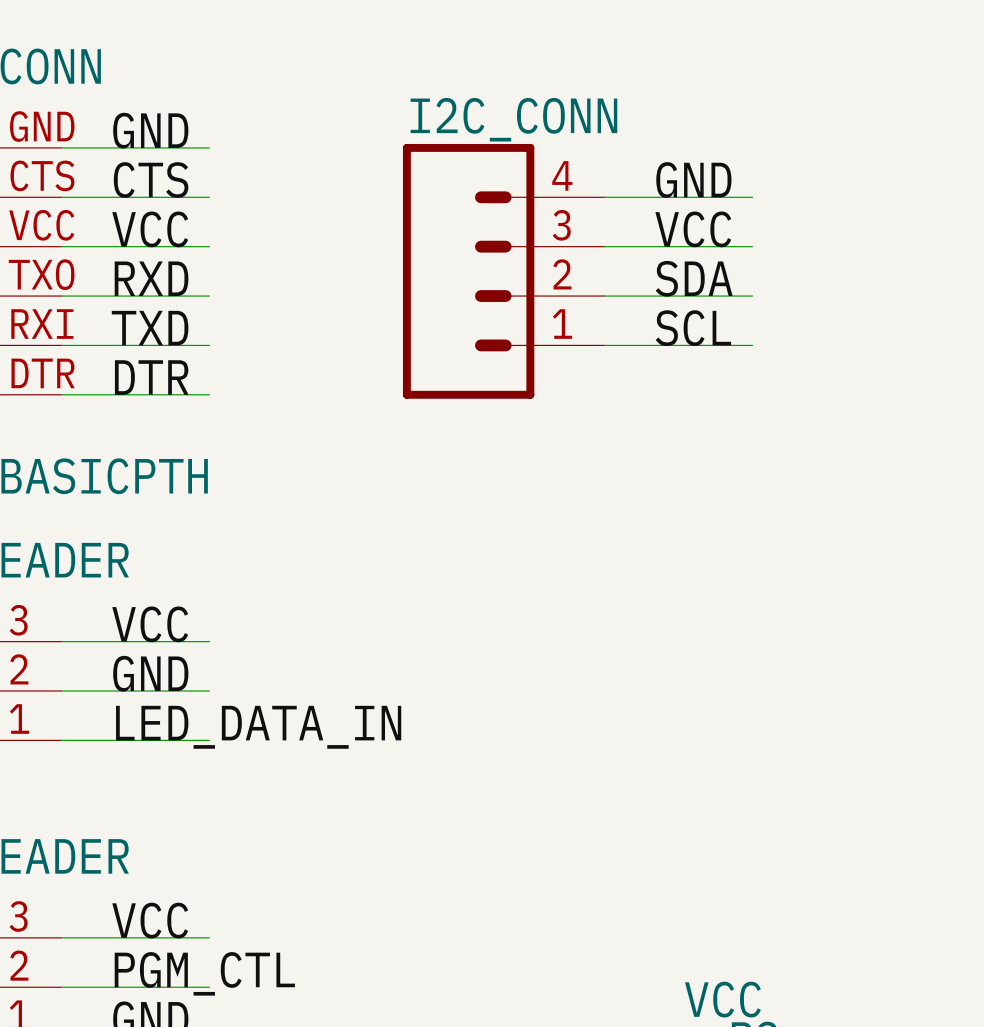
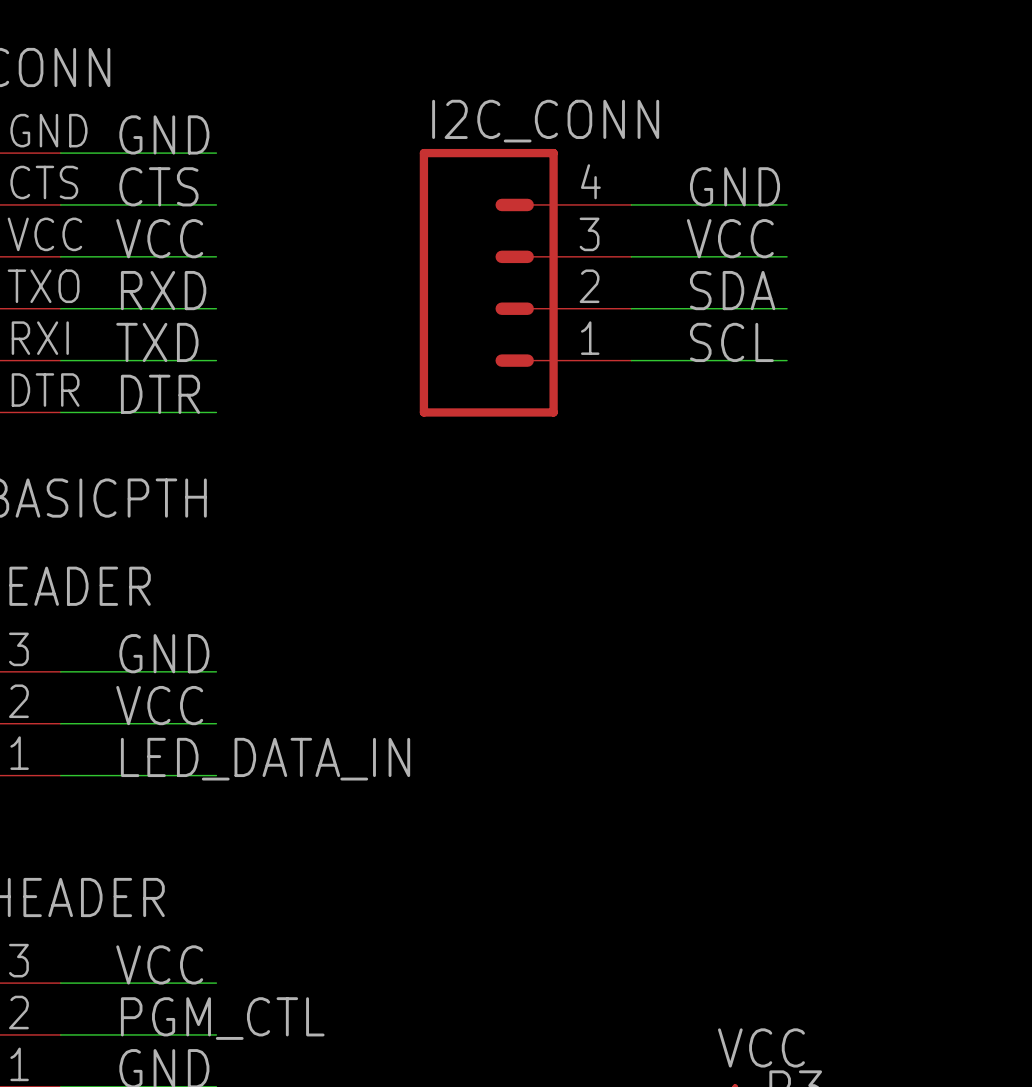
label: VCC (150, 624) -> GND (164, 653)
label: GND (150, 673) -> VCC (159, 705)

